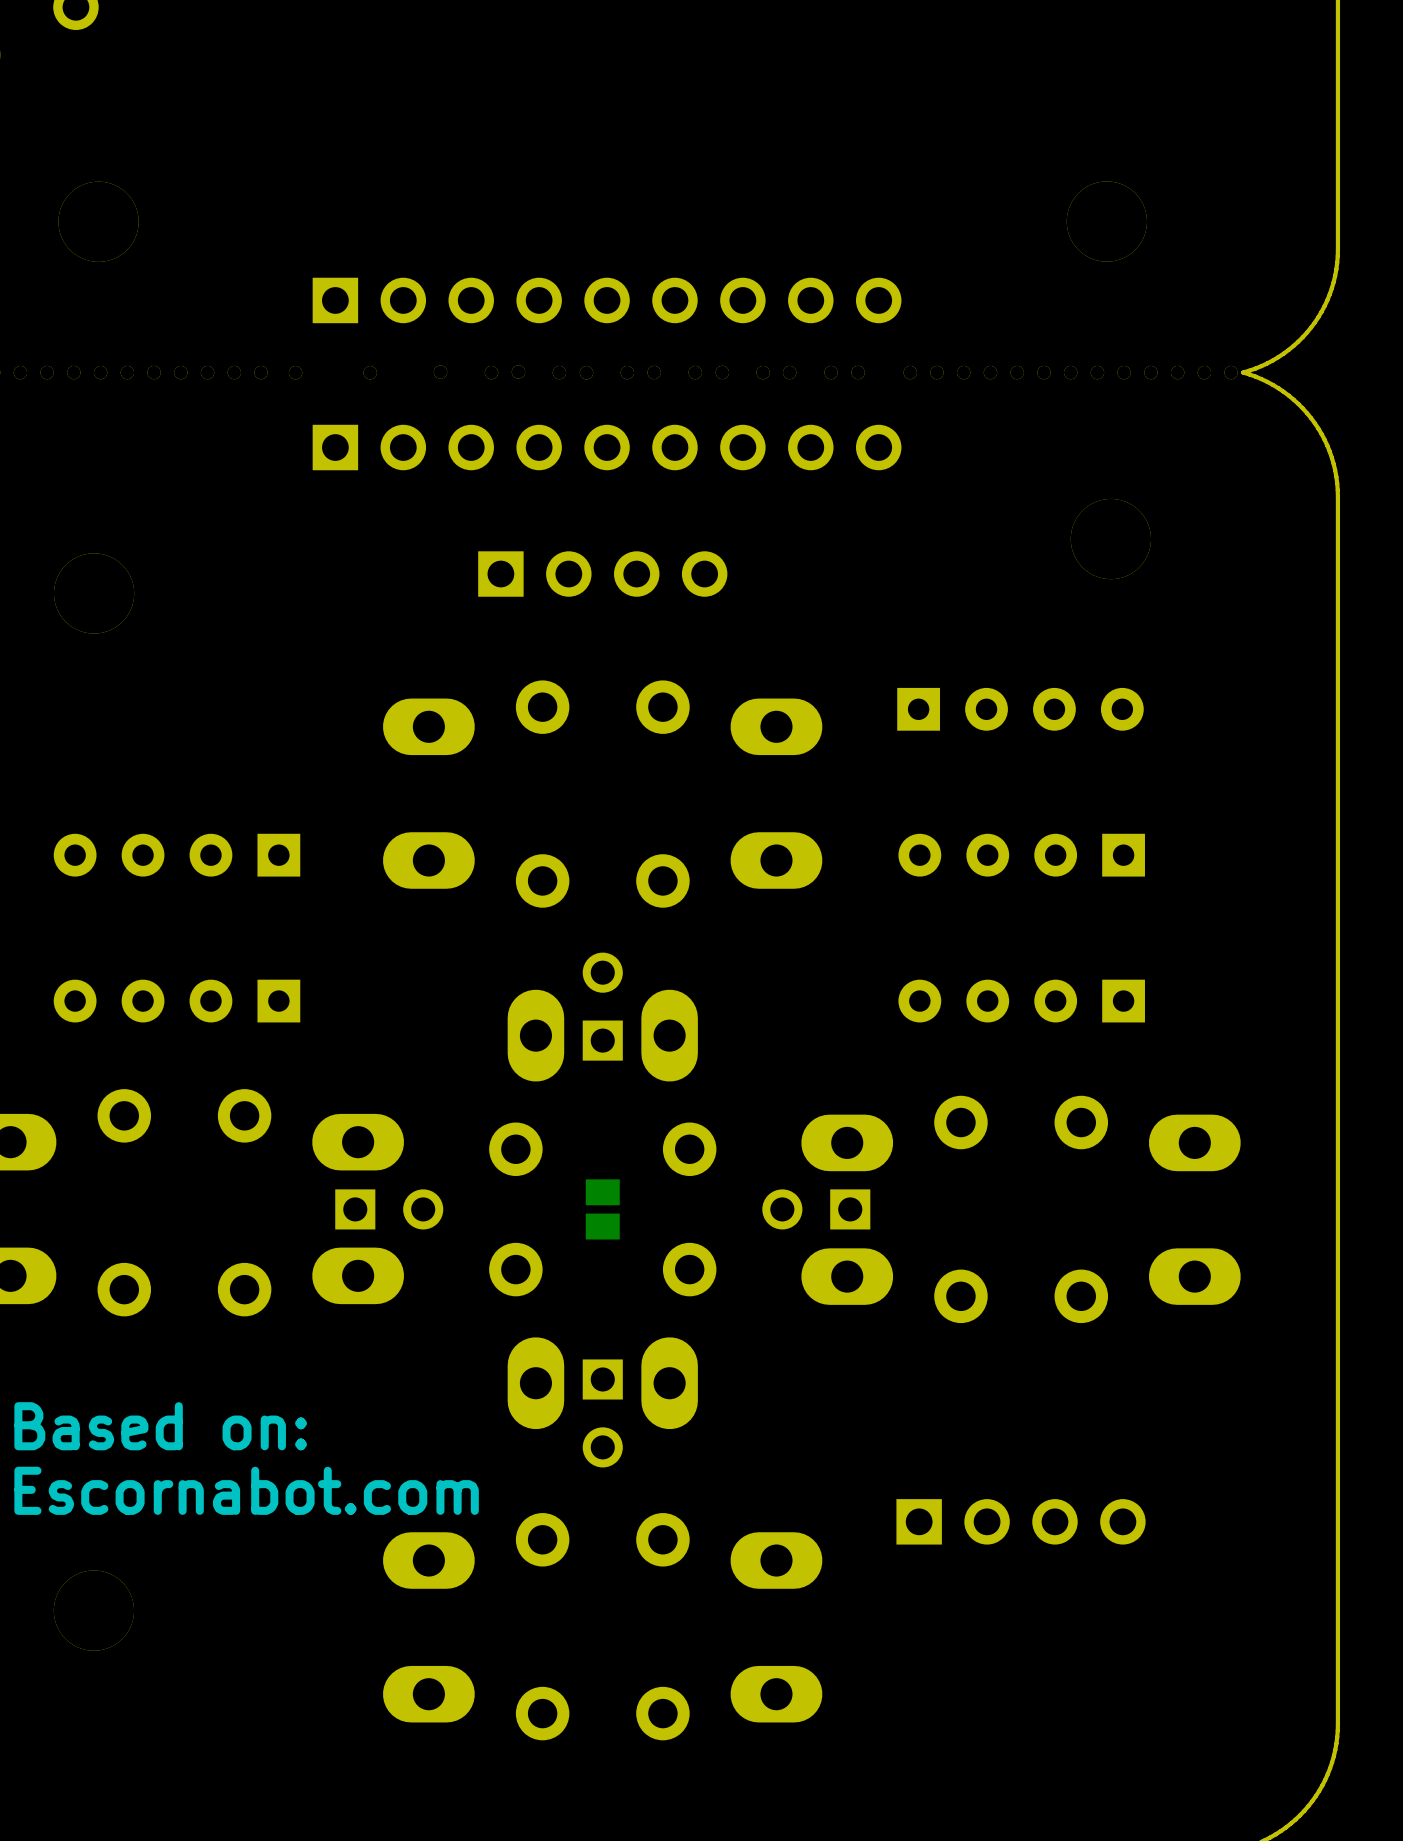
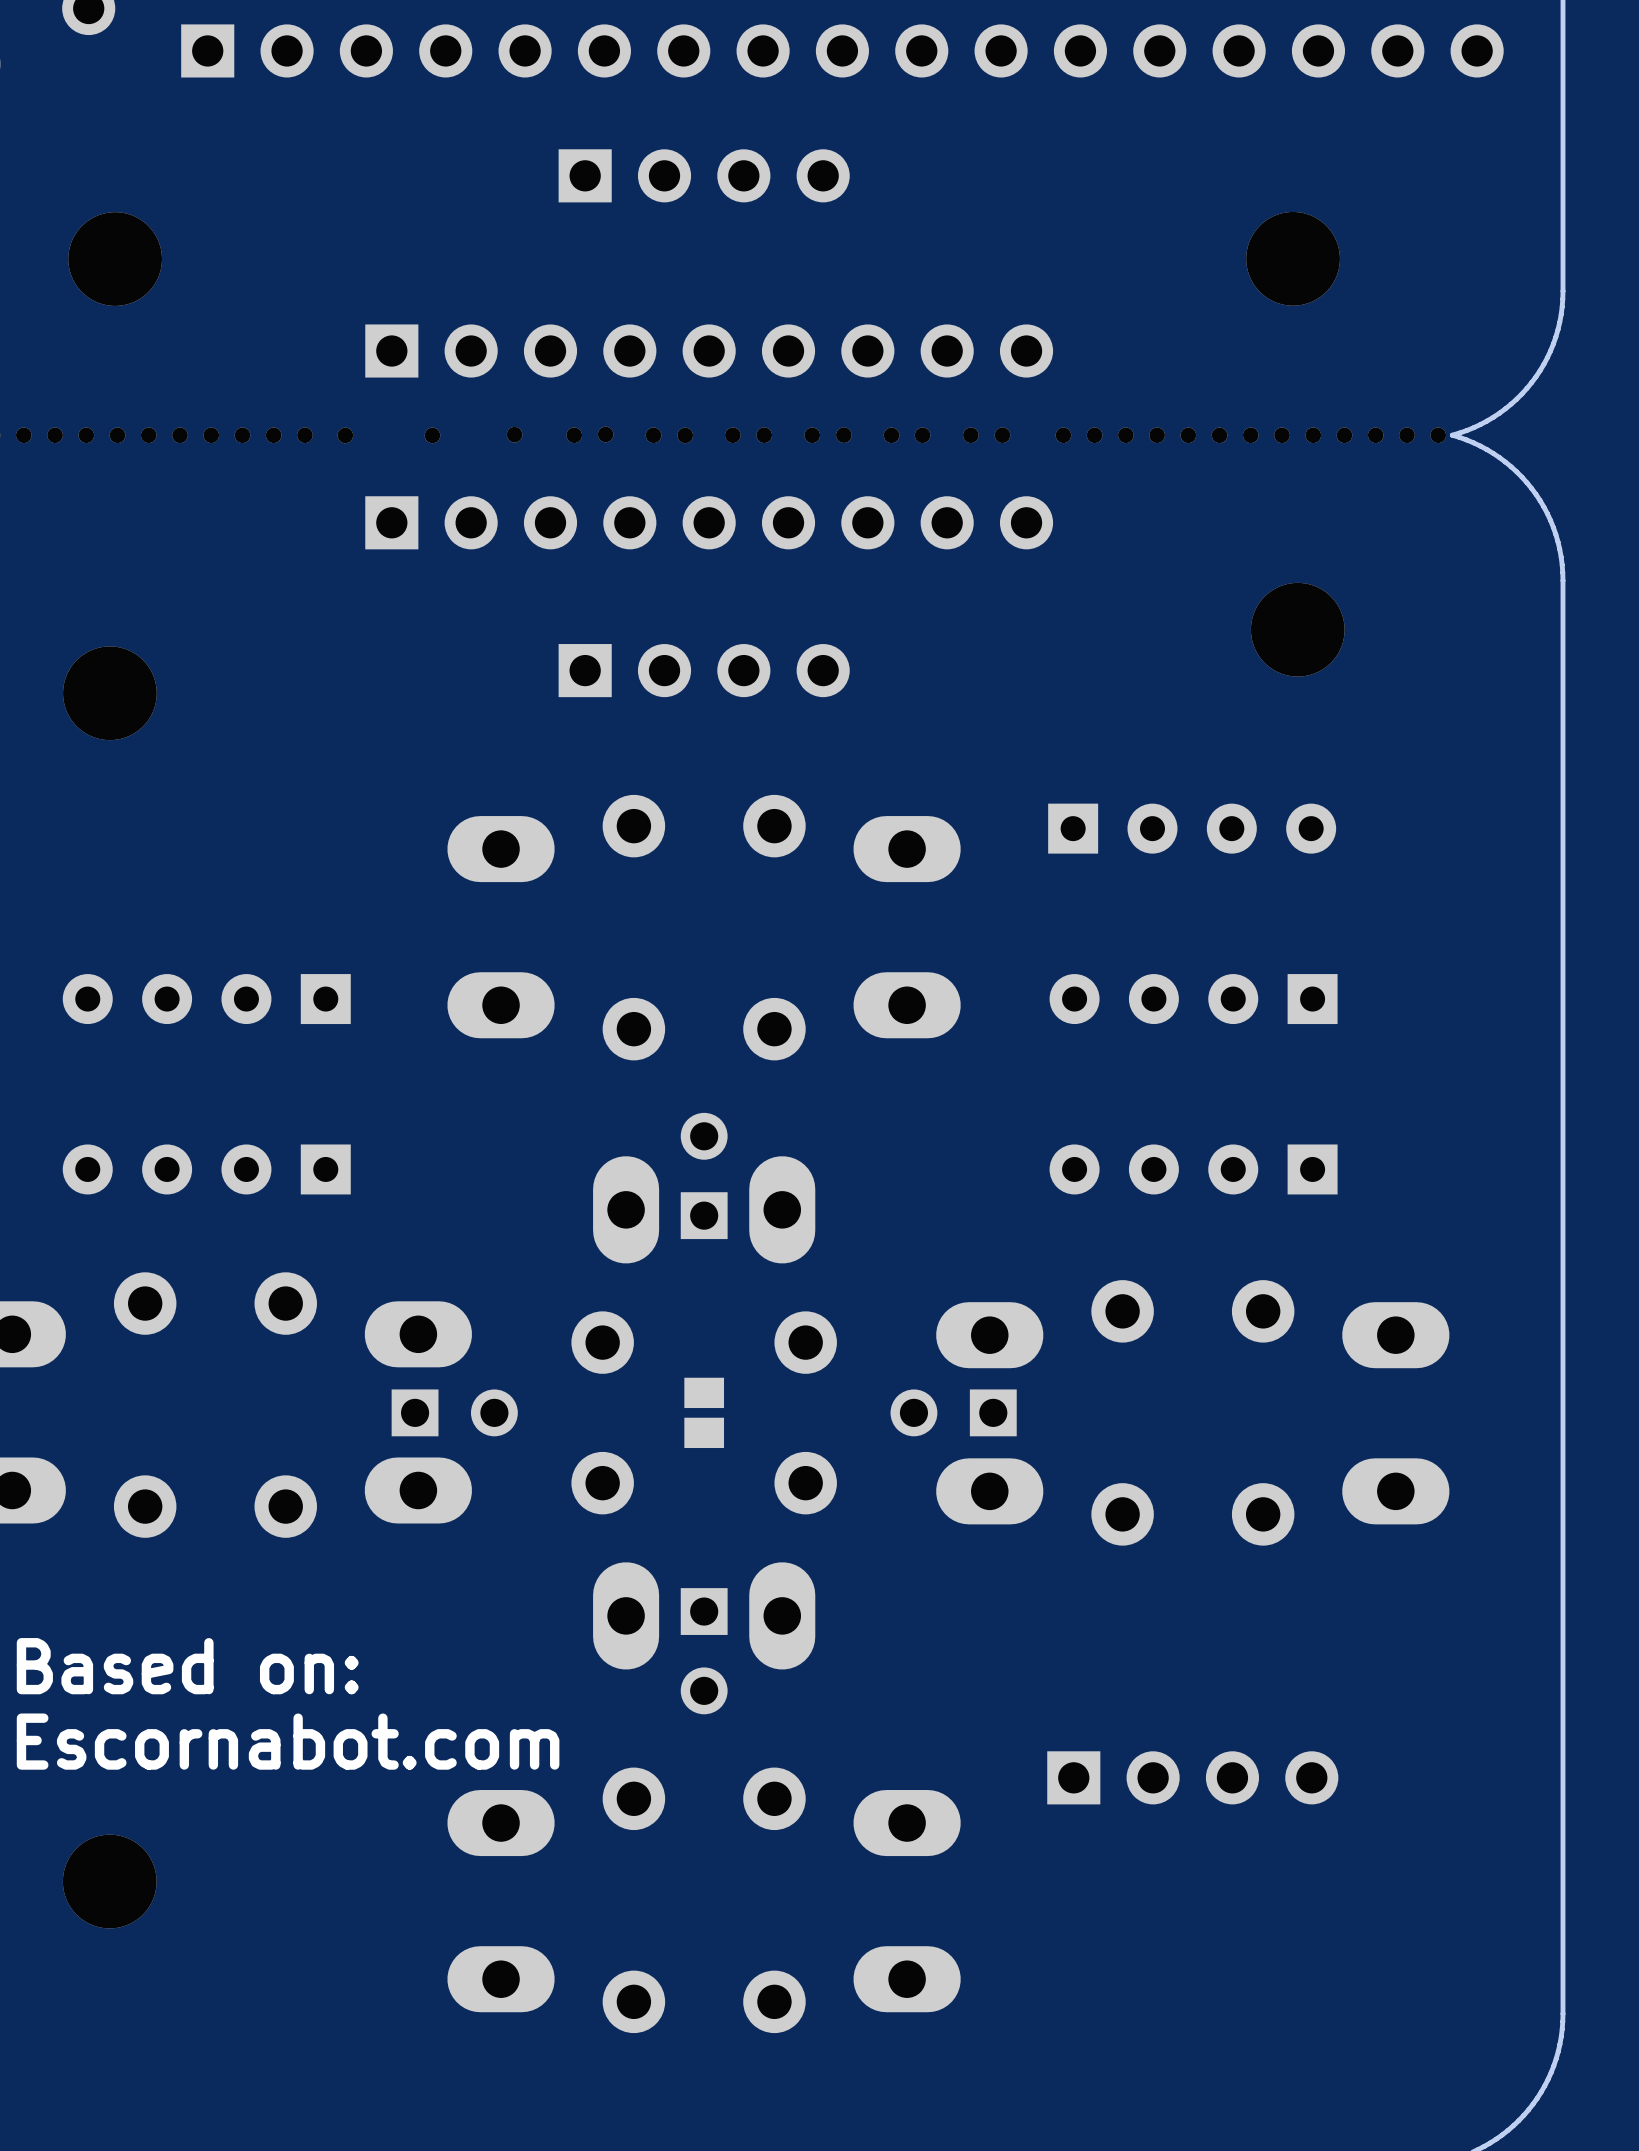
part: none -> (842, 50)
part: none -> (704, 175)

